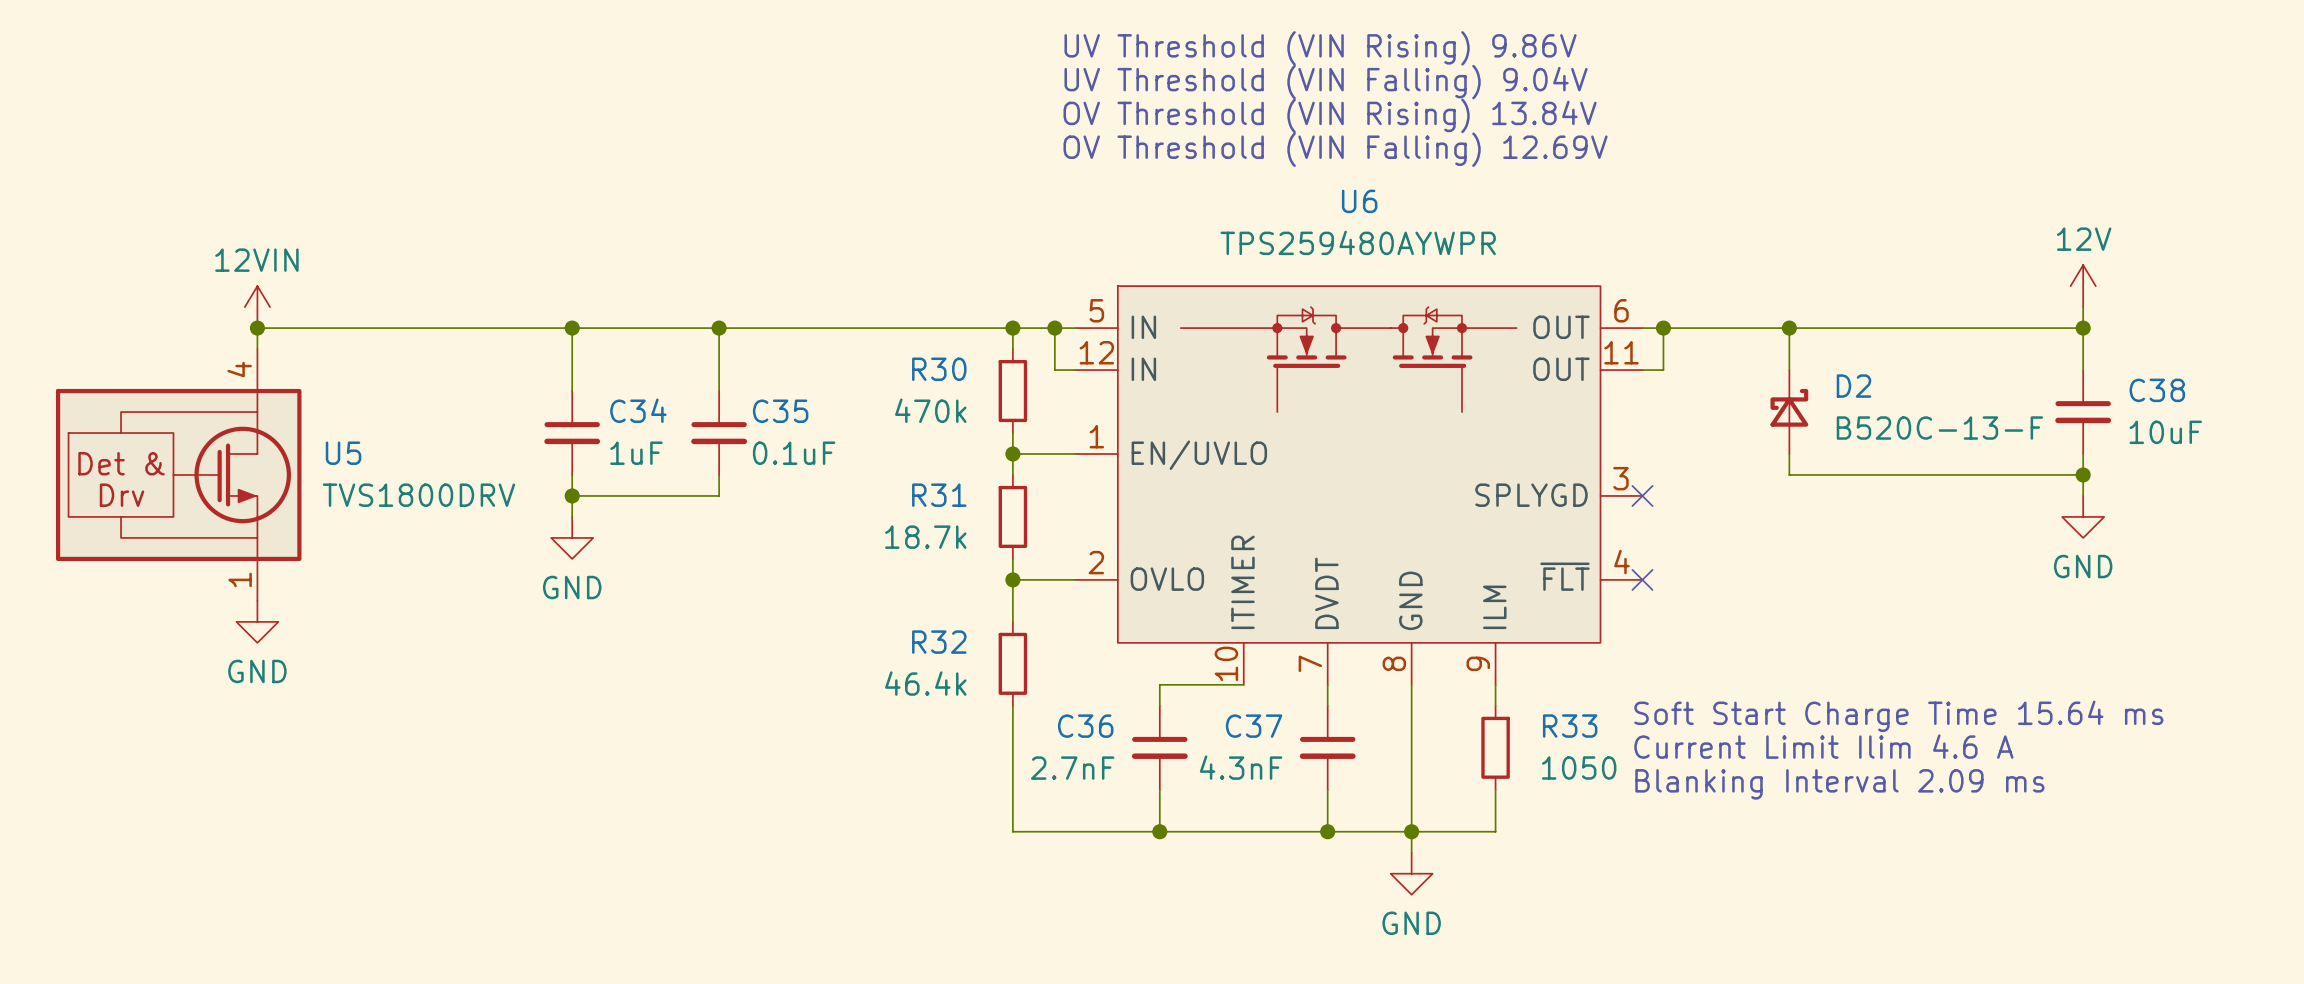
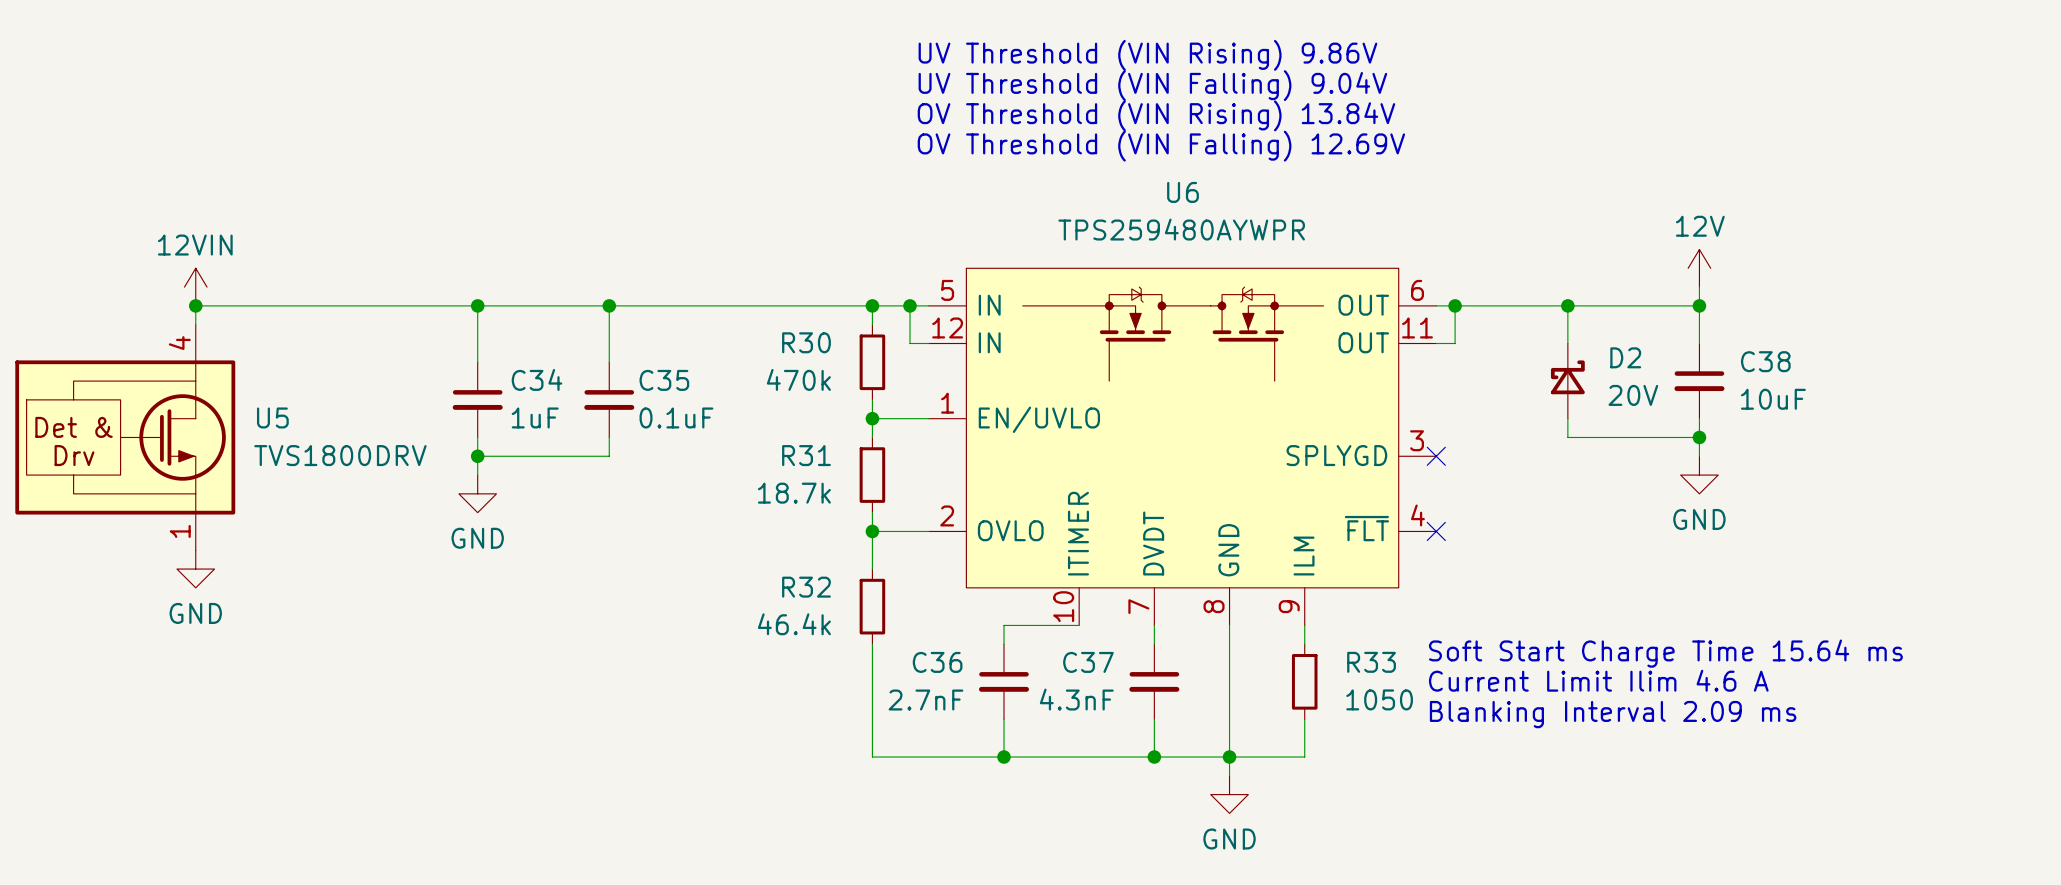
power symbol position: 12V (2083, 286) -> 12V (1699, 268)
wire: (2083, 307) (2083, 370) -> (1699, 287) (1699, 343)
wire: (1936, 328) (2083, 328) -> none
junction: none -> (1699, 305)
junction: (2083, 328) -> none
C38 position: (2083, 412) -> (1699, 381)
D2 value: B520C-13-F (1939, 428) -> 20V (1633, 395)
wire: (2083, 453) (2083, 495) -> (1699, 418) (1699, 456)
wire: (1936, 474) (2083, 474) -> none
junction: none -> (1699, 437)
junction: (2083, 474) -> none
power symbol position: GND (2083, 516) -> GND (1699, 475)

